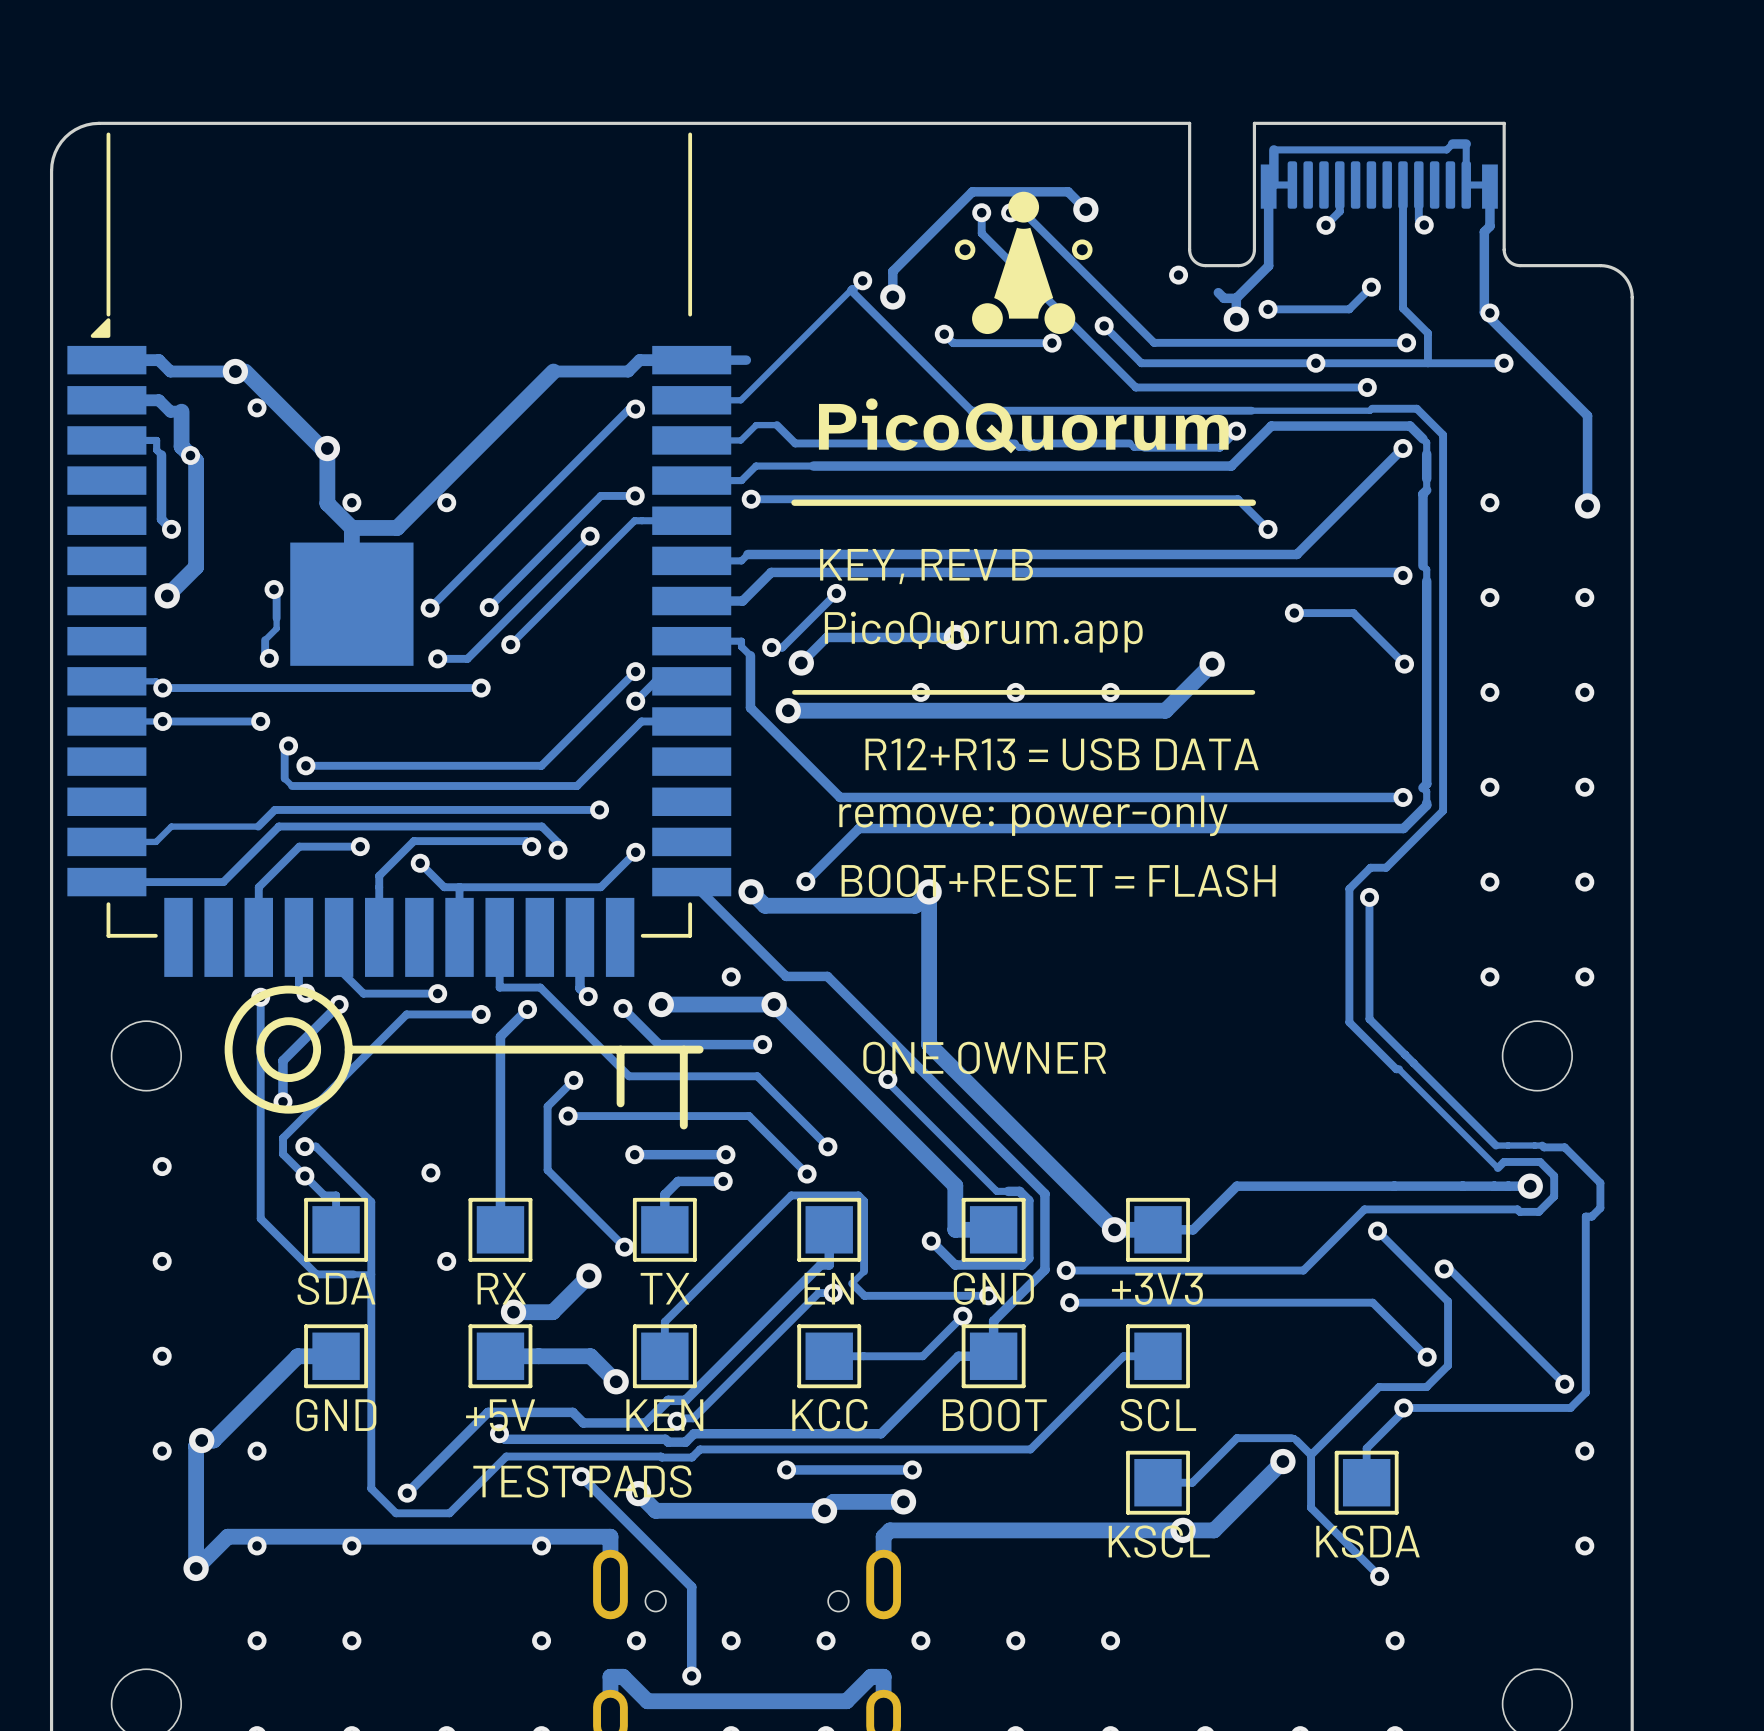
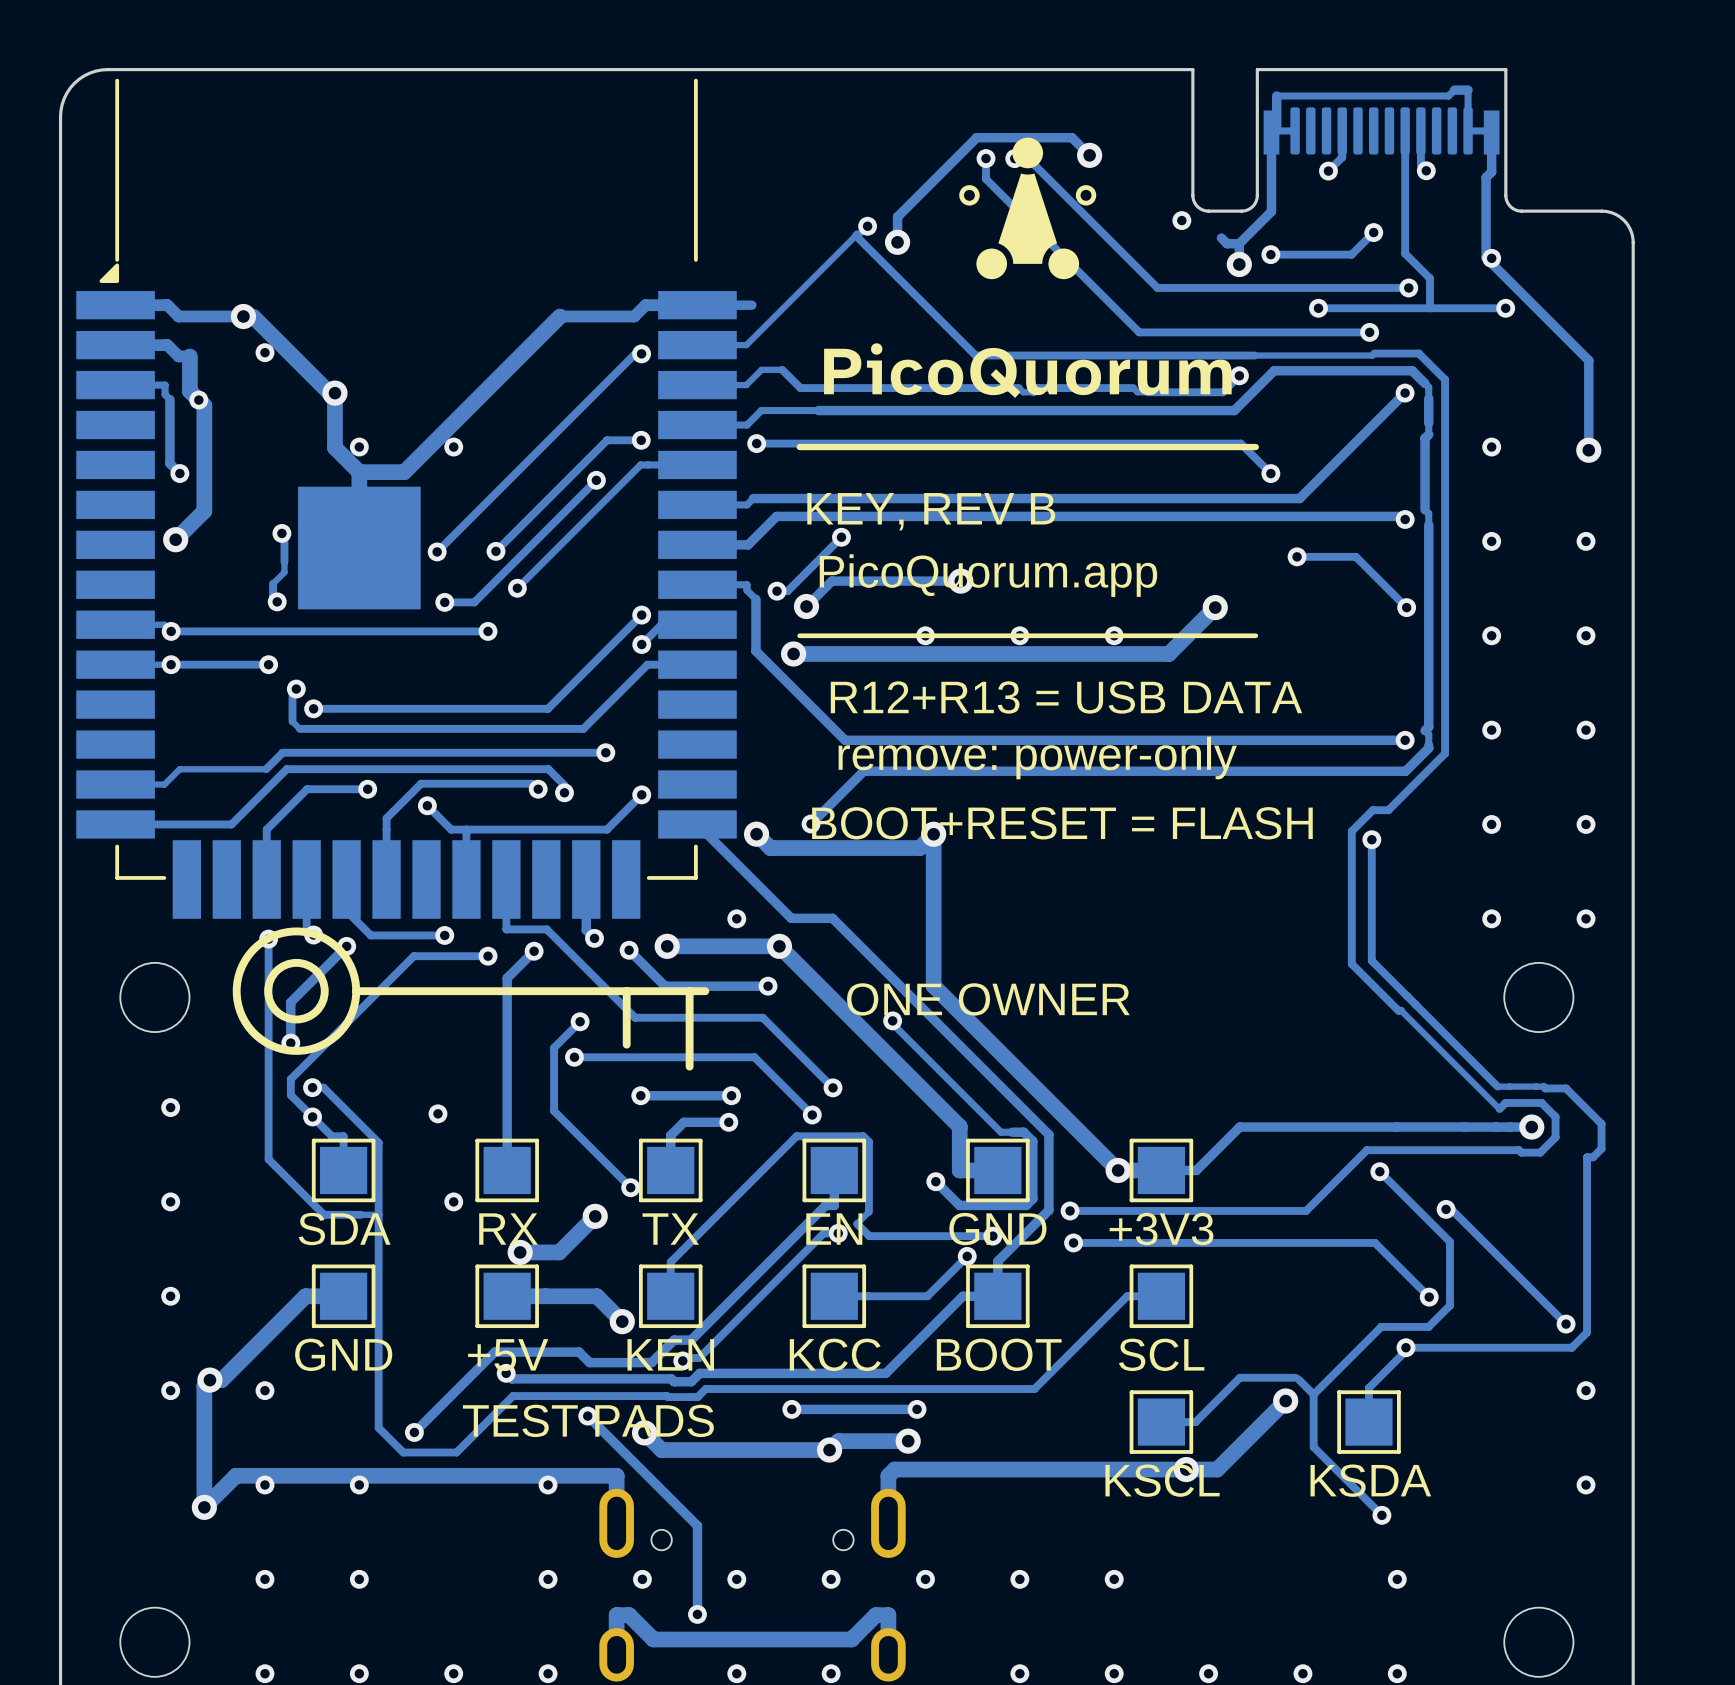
track: (1104, 325) (1141, 363) (1315, 363) -> none
via: (1104, 325) -> none
track: (944, 334) (953, 343) (1052, 343) -> none
via: (944, 334) -> none
via: (1052, 343) -> none

